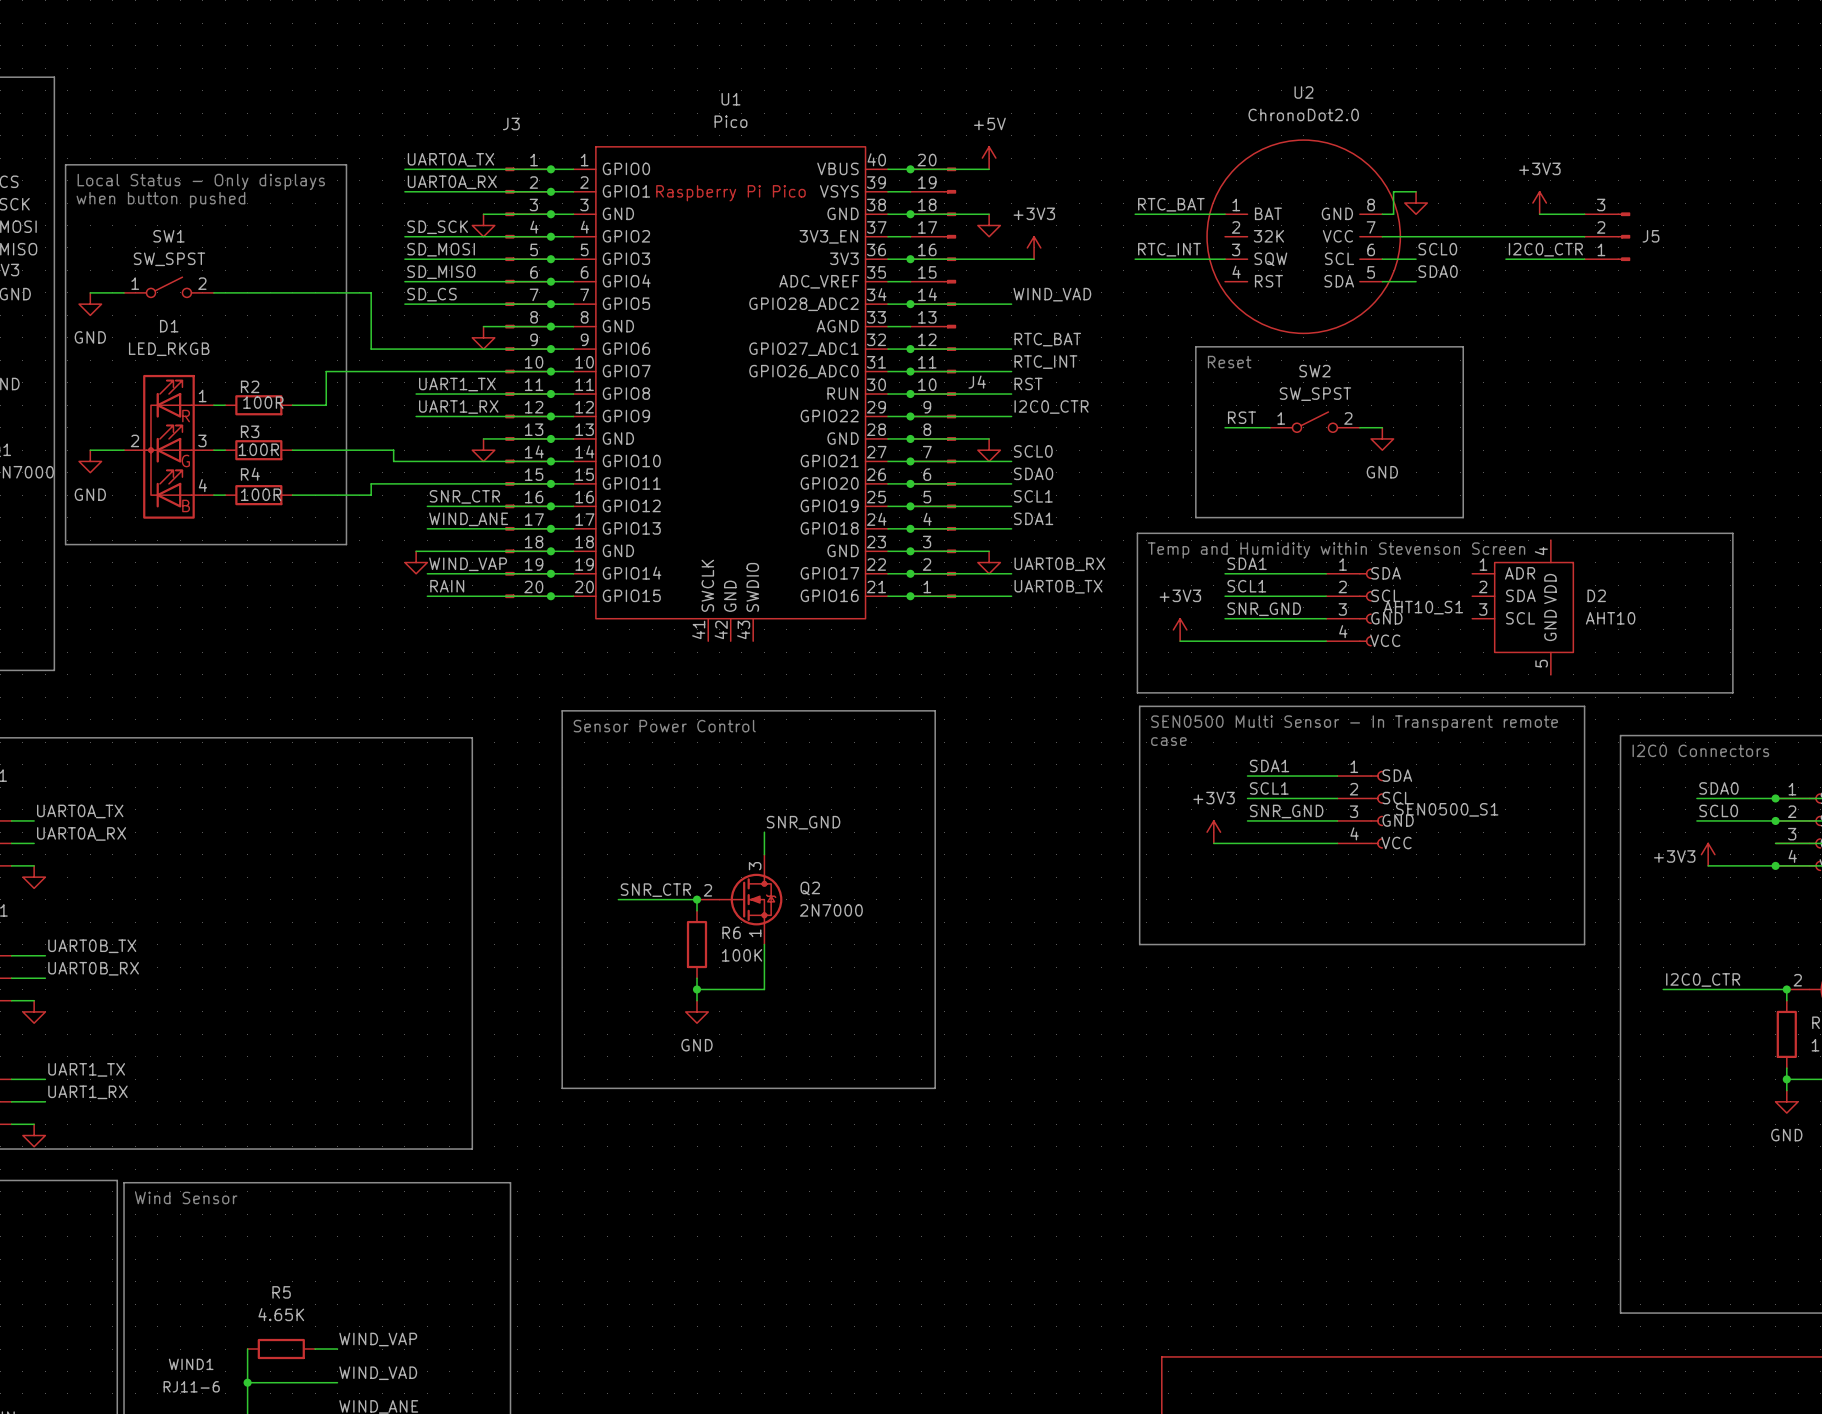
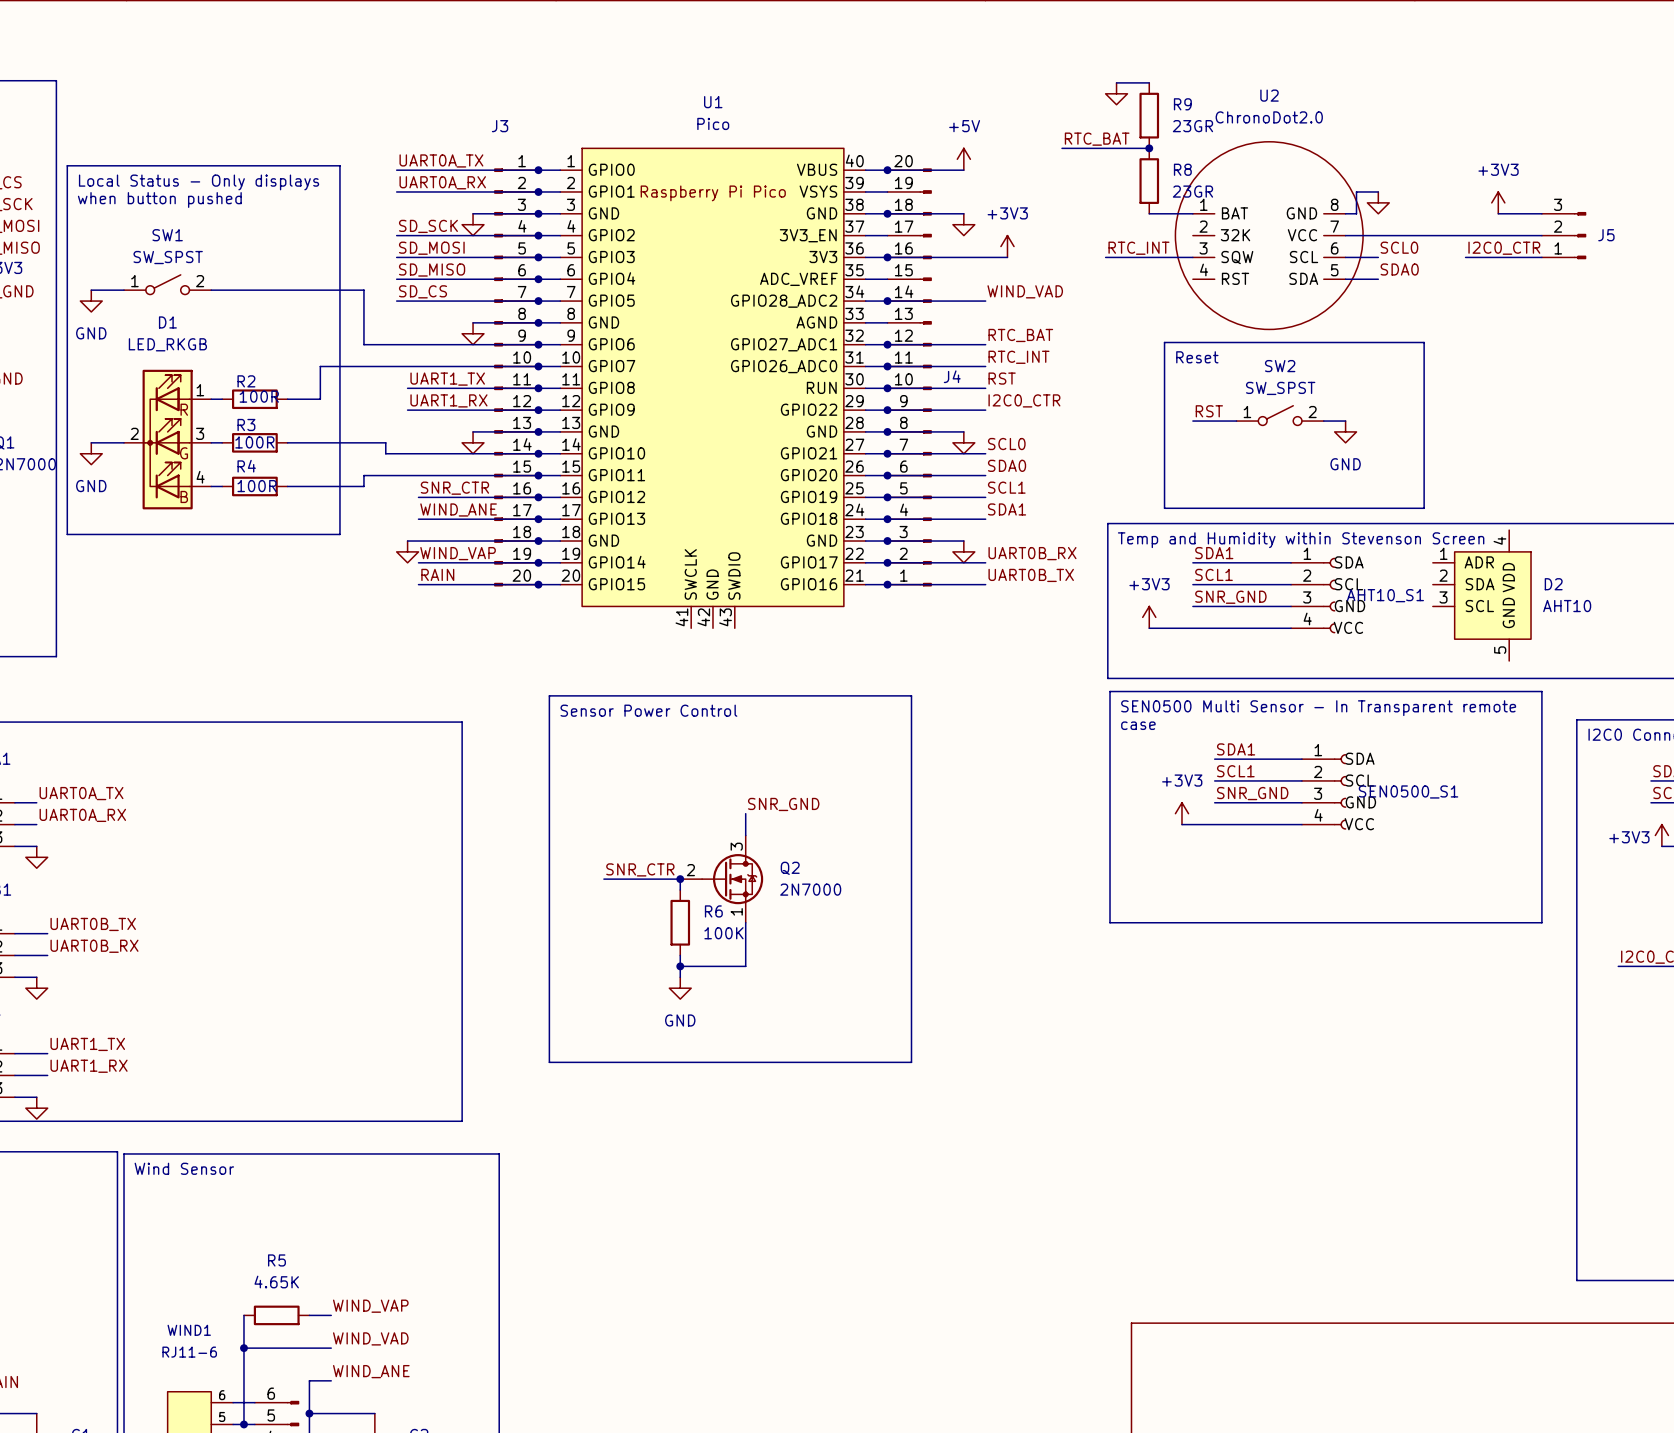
wire: none -> (1116, 82) (1149, 82)
power symbol: none -> (1116, 93)
R9: none -> 23GR (1149, 115)
wire: none -> (1062, 148) (1149, 148)
junction: none -> (1149, 148)
R8: none -> 23GR (1149, 181)
label position: RTC_BAT (1171, 204) -> RTC_BAT (1097, 139)
wire: (1135, 214) (1180, 214) -> none

